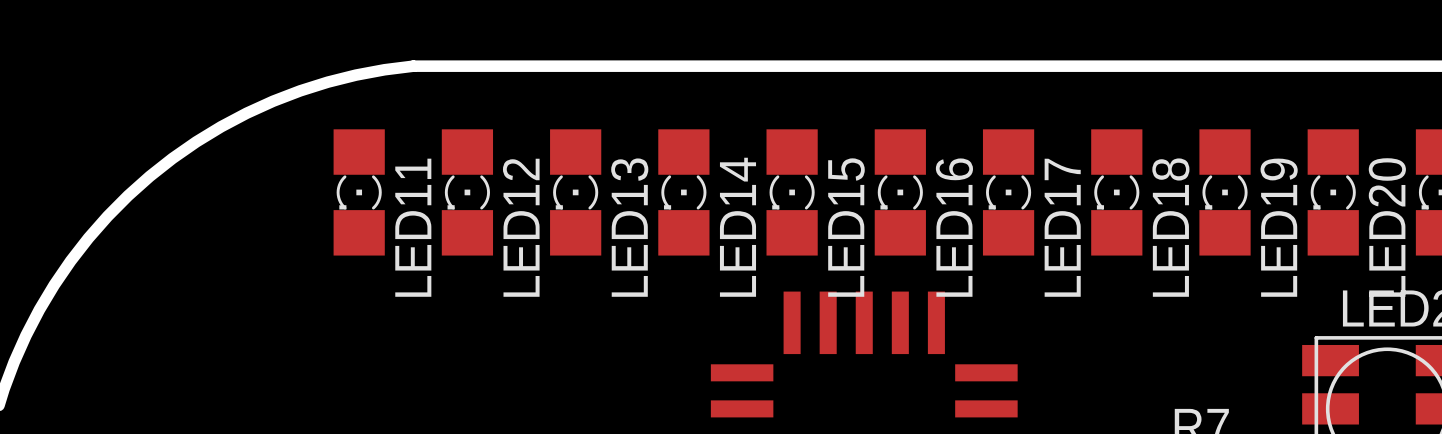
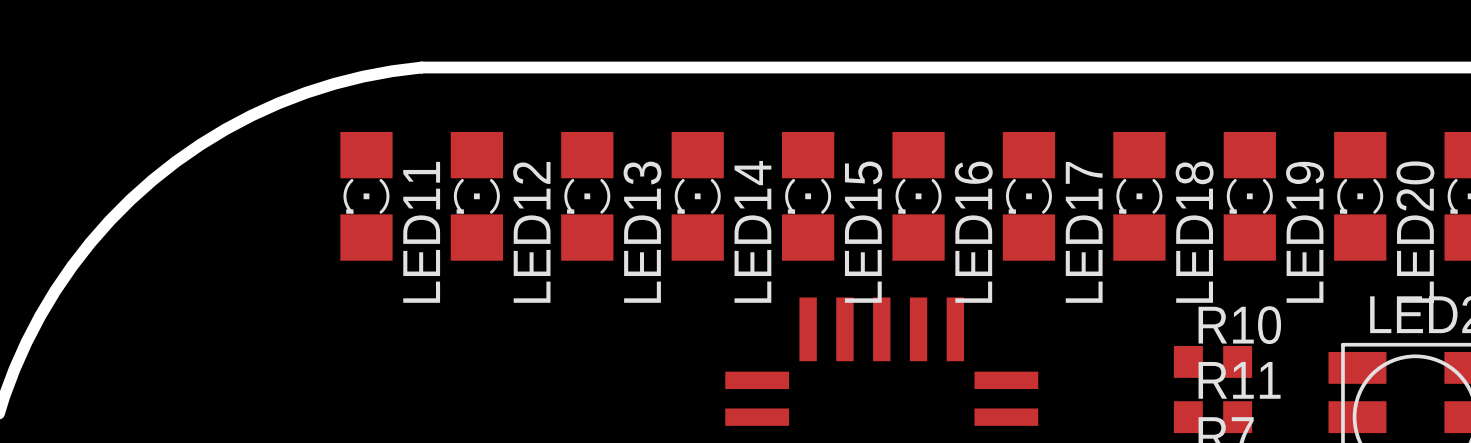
R10: none -> (1213, 361)
R11: none -> (1213, 417)

